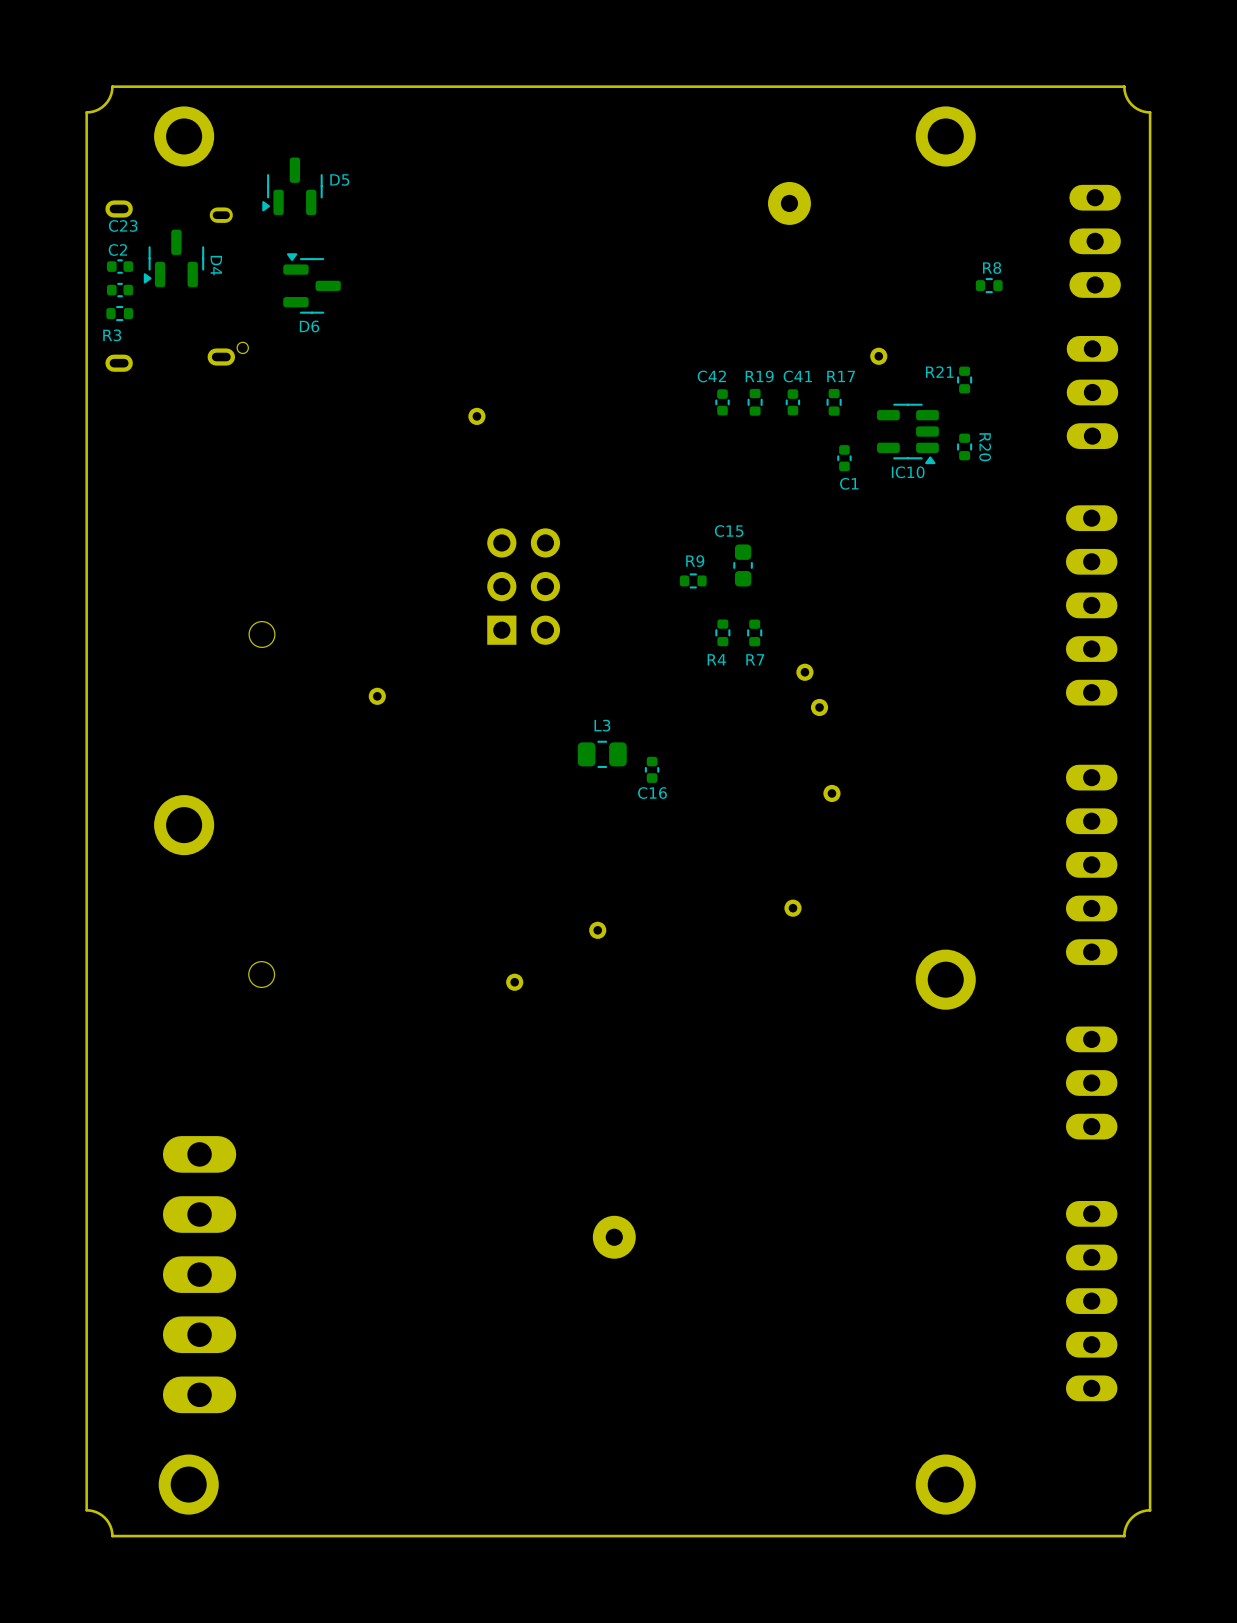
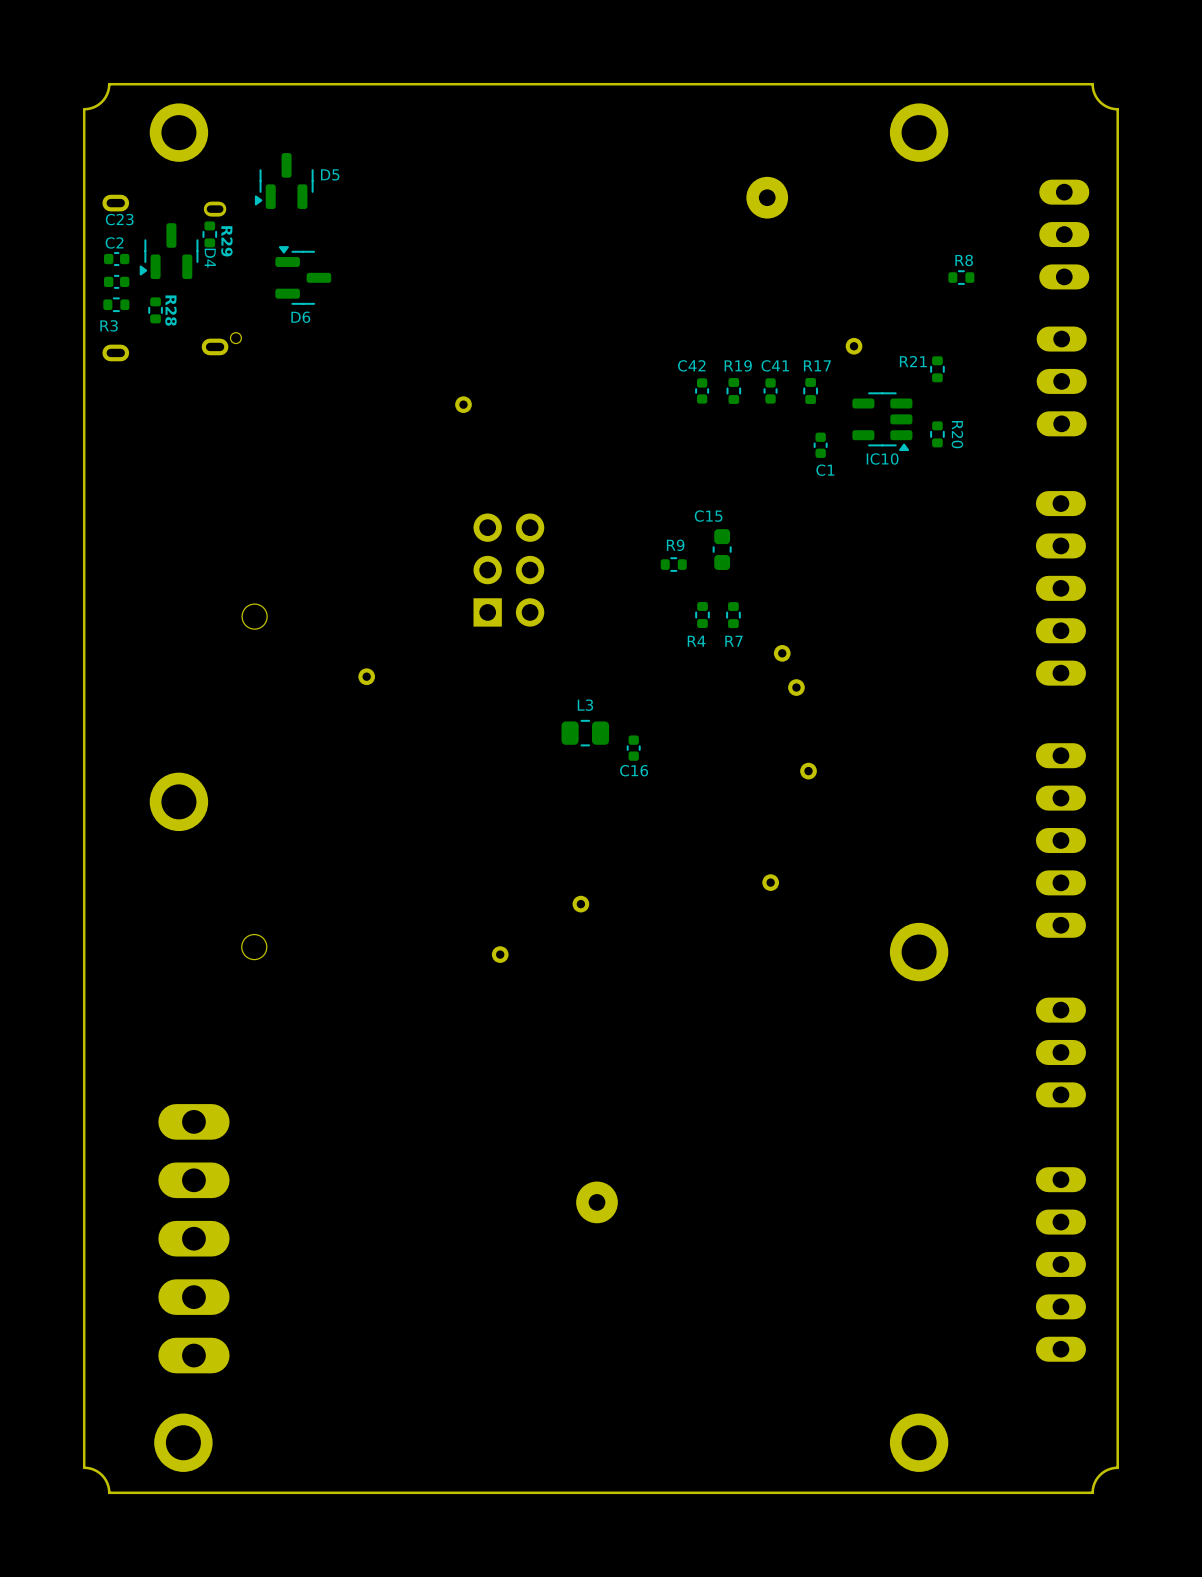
R29: none -> (209, 234)
R28: none -> (155, 310)

